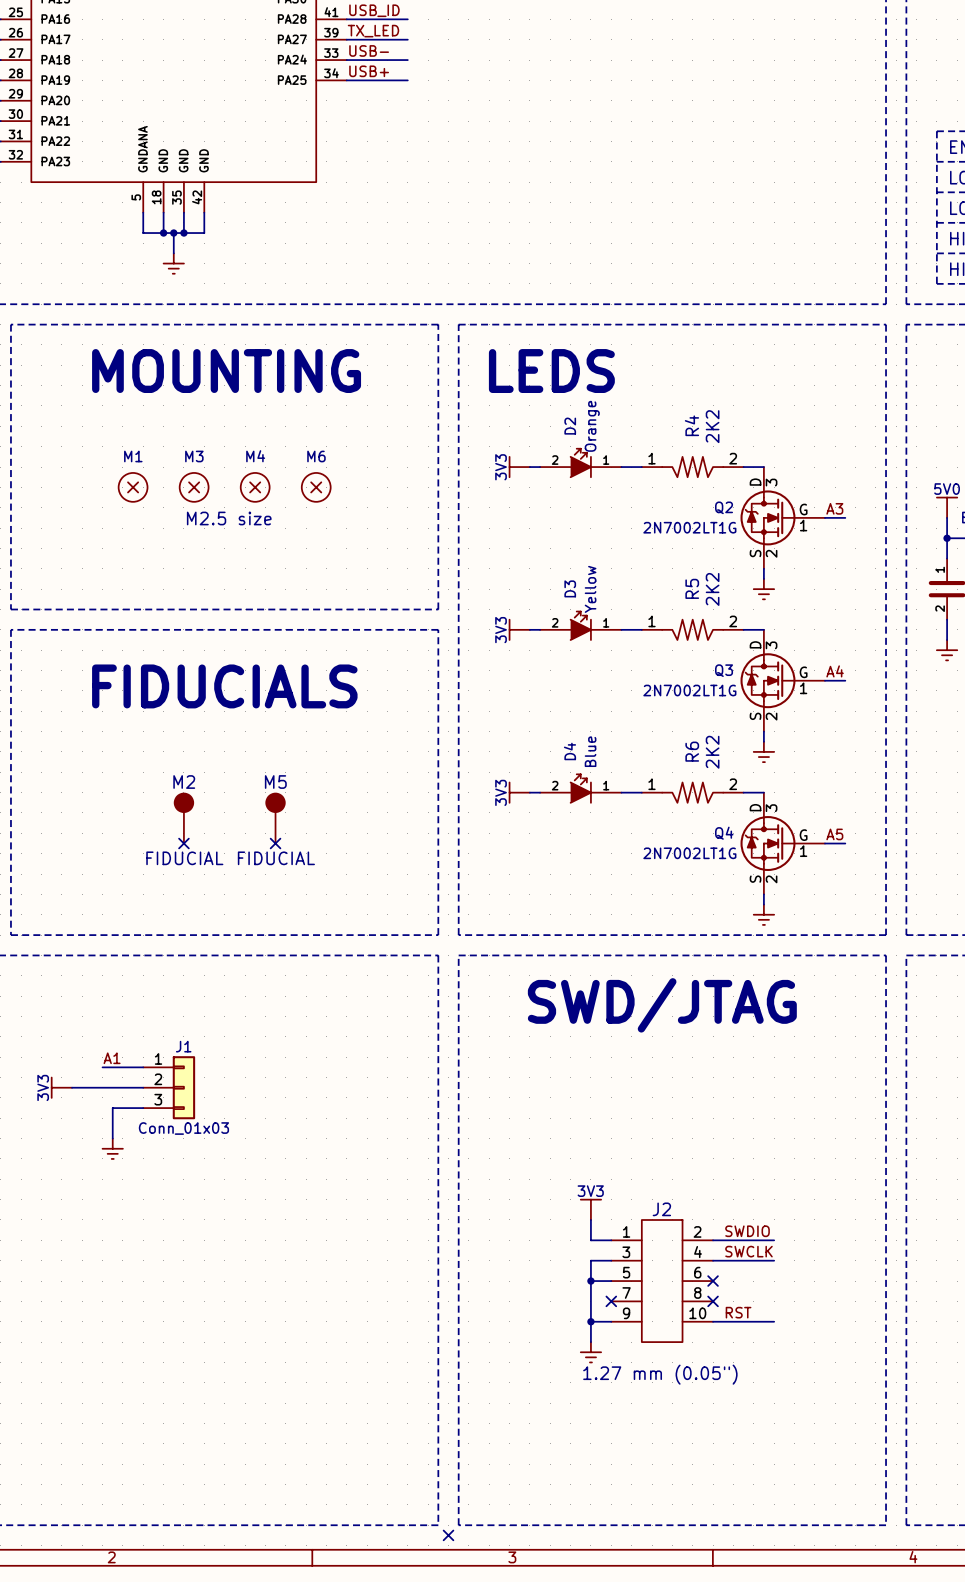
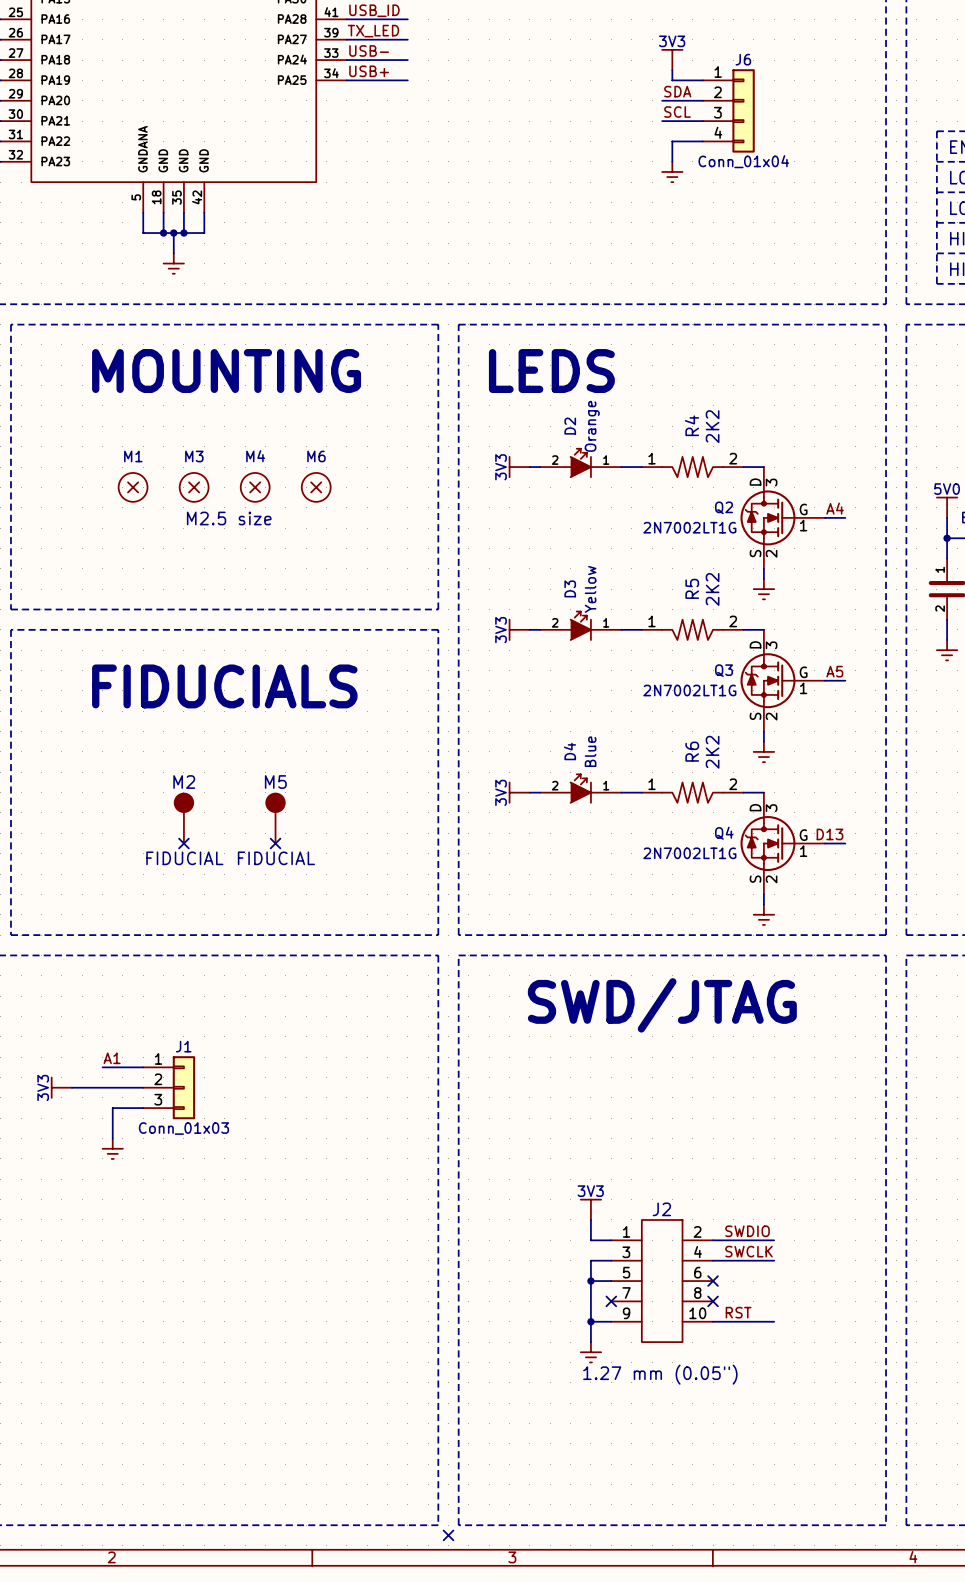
power symbol: none -> 3V3 (672, 60)
wire: none -> (672, 70) (672, 80) (702, 80)
label: none -> SDA (677, 91)
wire: none -> (662, 100) (702, 100)
J6: none -> Conn_01x04 (728, 110)
label: none -> SCL (677, 112)
wire: none -> (662, 121) (702, 121)
wire: none -> (702, 141) (672, 141) (672, 161)
power symbol: none -> (672, 171)
label: A3 (834, 508) -> A4 (835, 508)
label: A4 (835, 671) -> A5 (834, 671)
label: A5 (834, 834) -> D13 (829, 834)

